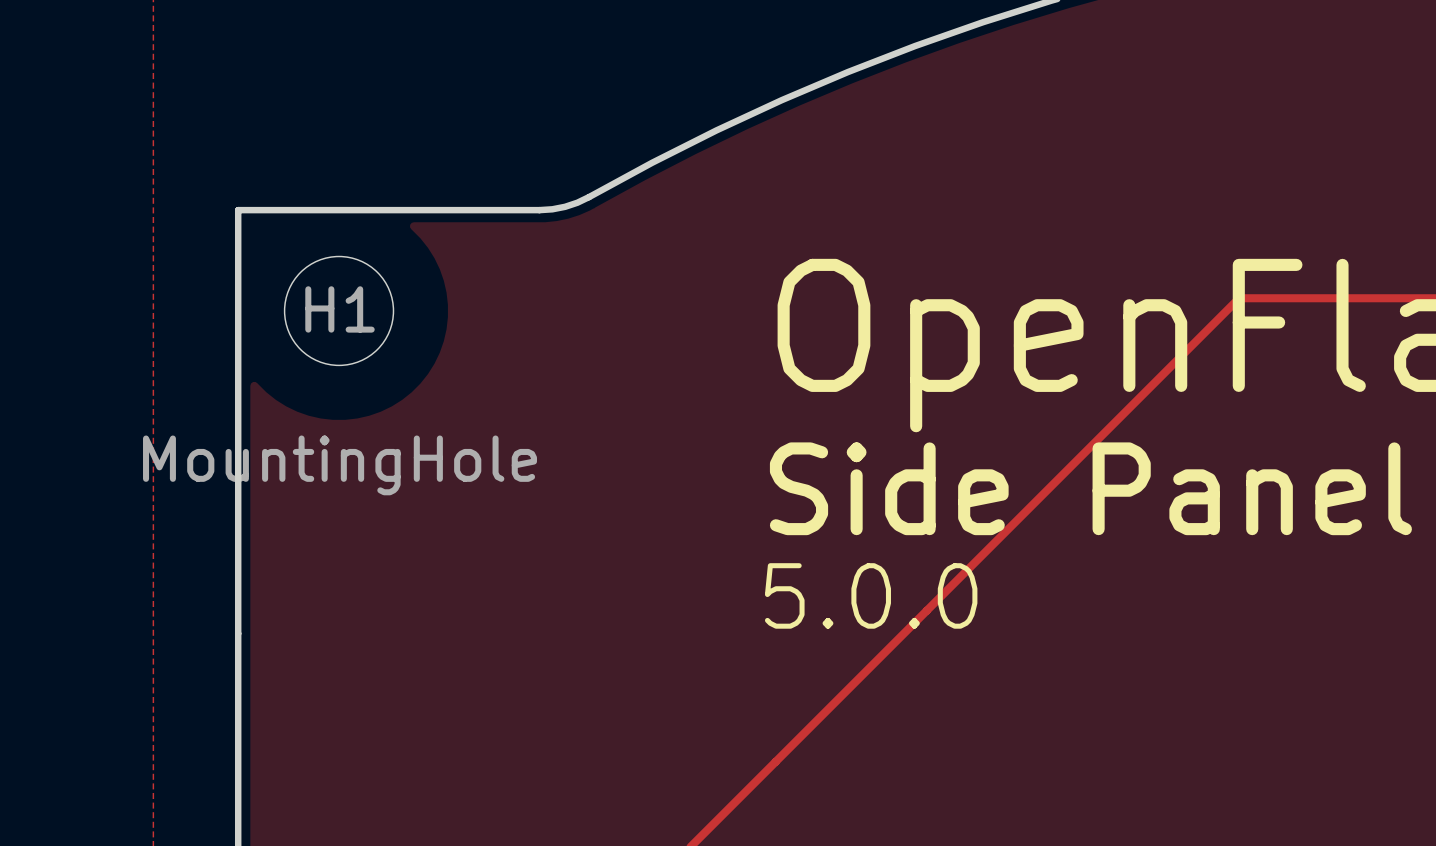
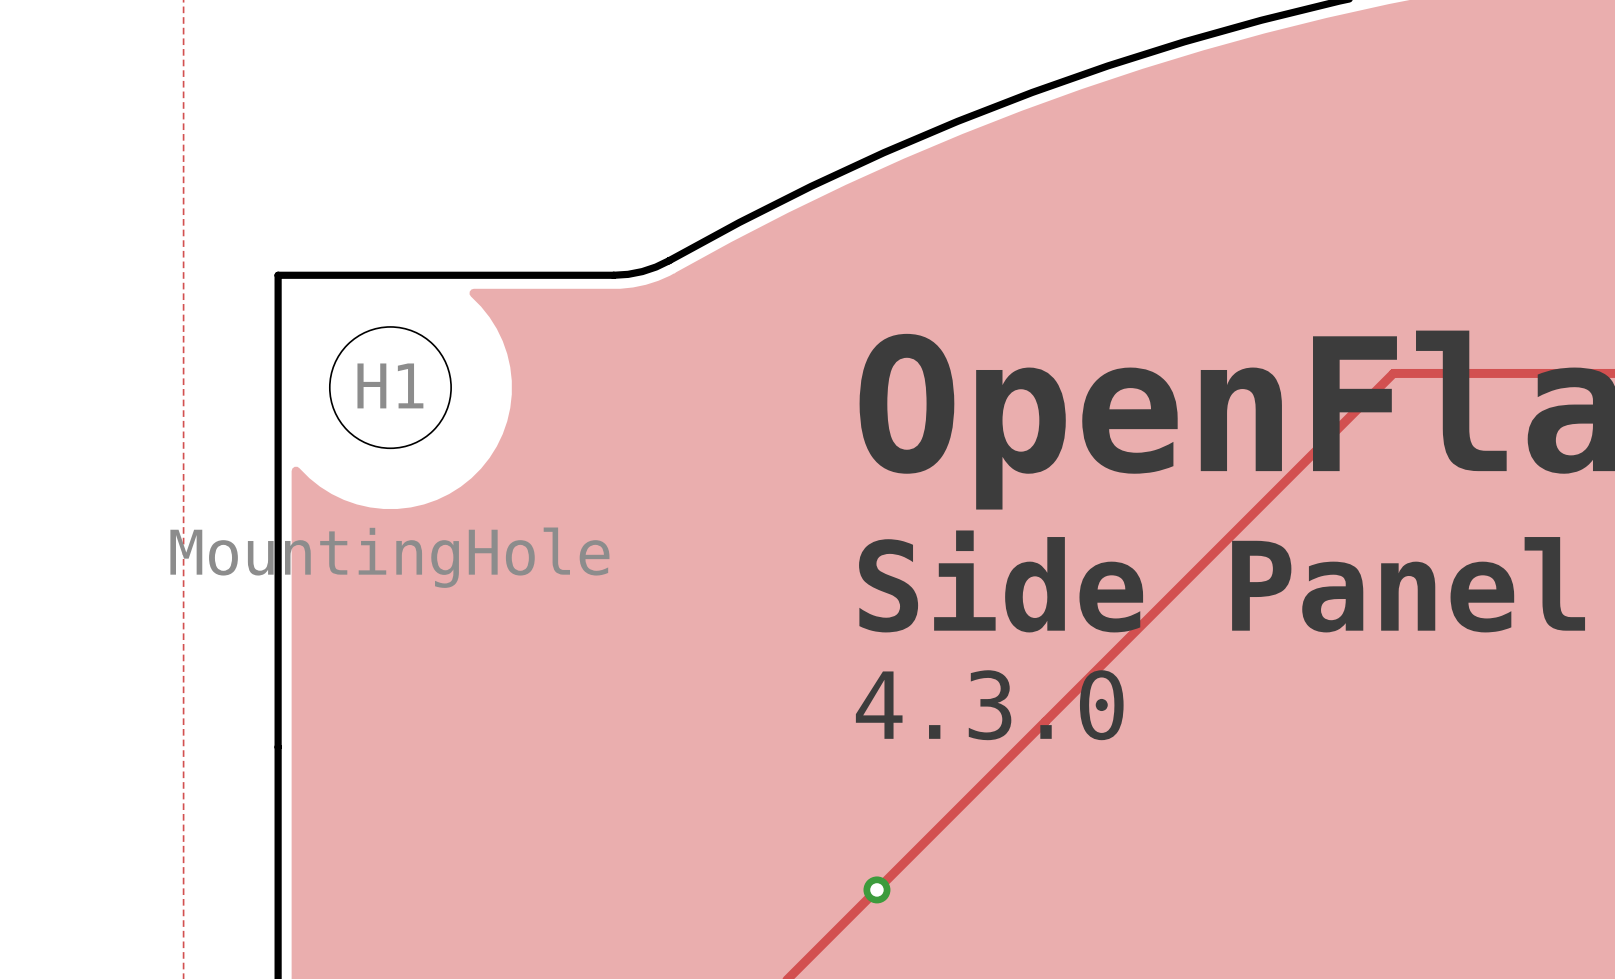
text: 5.0.0 (871, 595) -> 4.3.0 (989, 705)
via: none -> (876, 889)

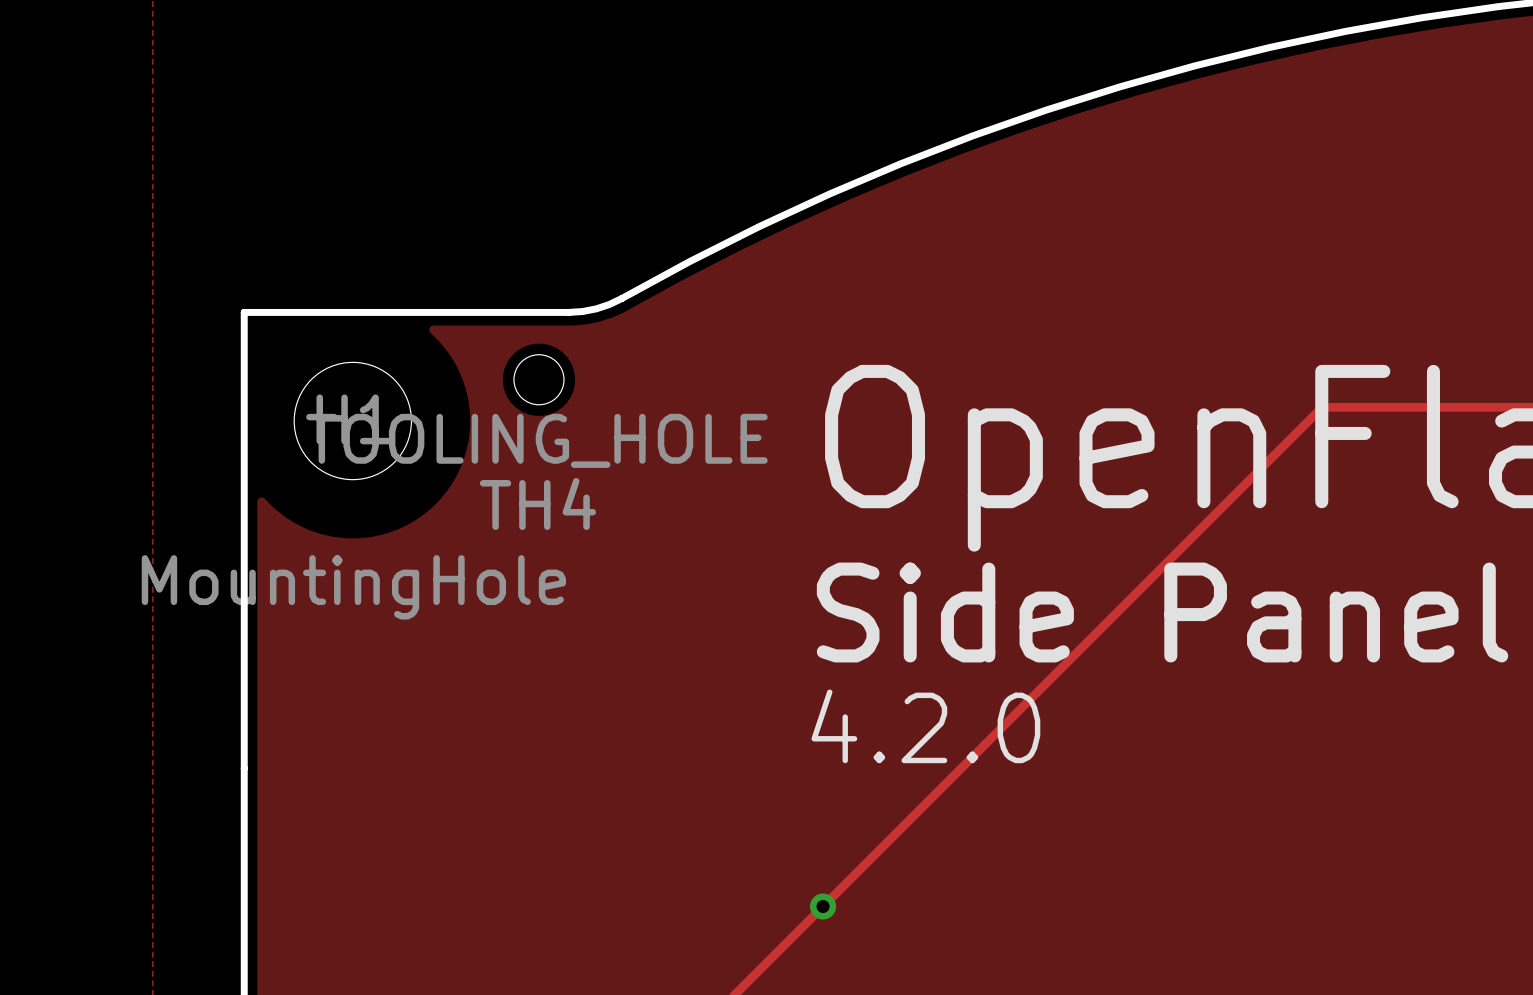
TH4: none -> TOOLING_HOLE (538, 379)
text: 4.3.0 (989, 705) -> 4.2.0 (925, 726)

